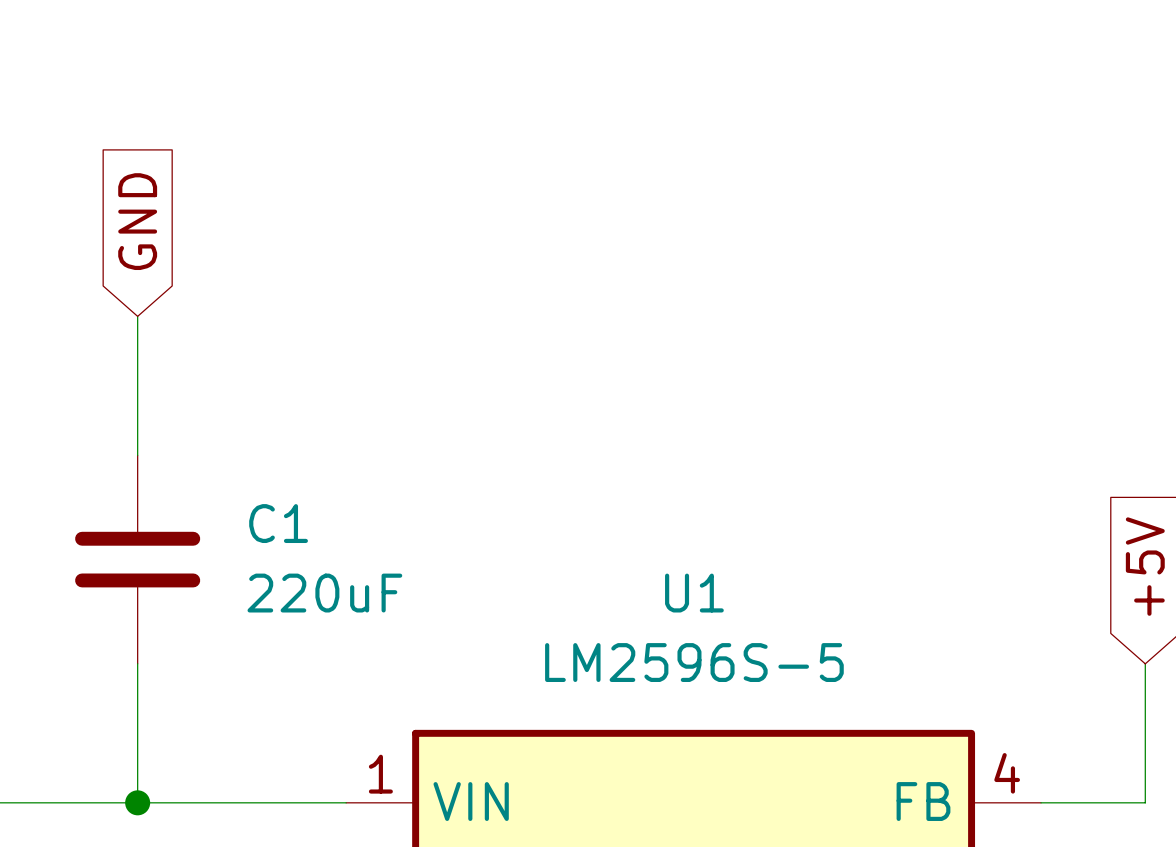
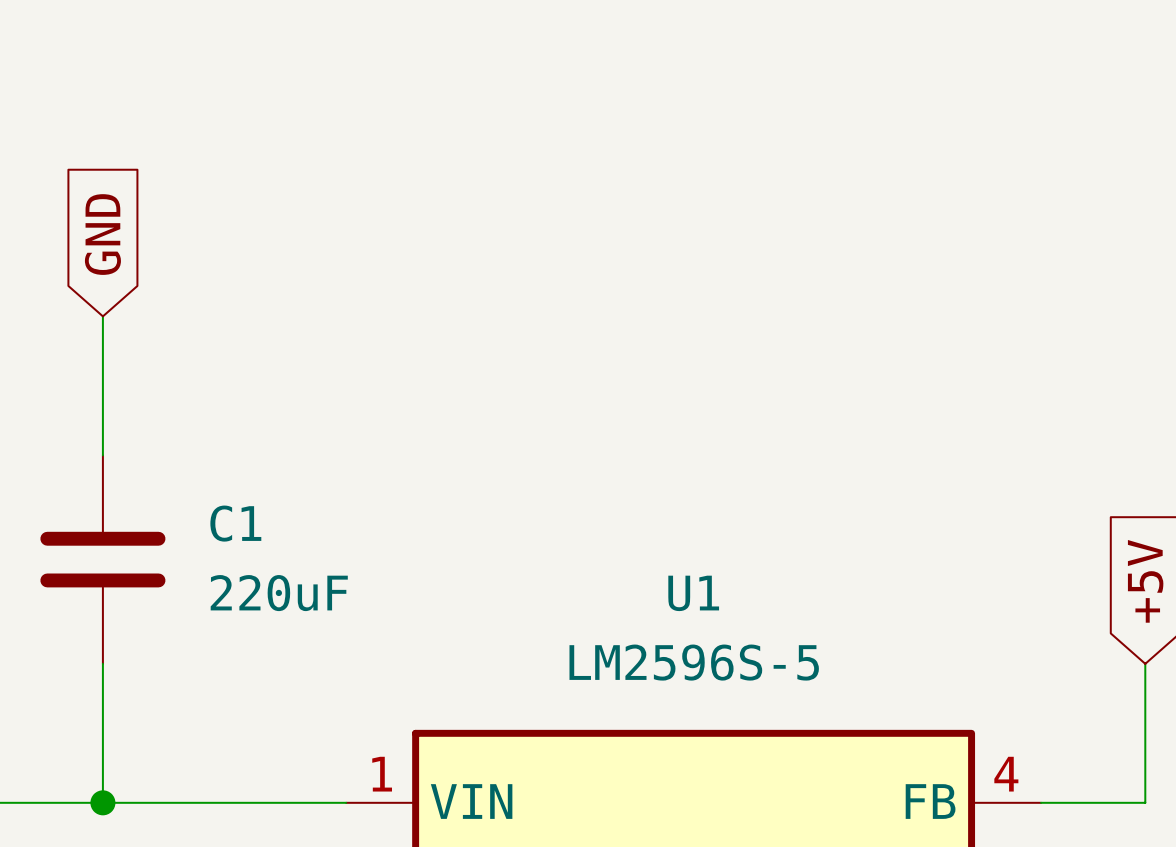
global label position: GND (137, 221) -> GND (102, 234)
wire: (137, 316) (137, 455) -> (102, 316) (102, 455)
C1 position: (137, 559) -> (102, 559)
wire: (137, 663) (137, 802) -> (102, 663) (102, 802)
junction position: (137, 802) -> (102, 802)

